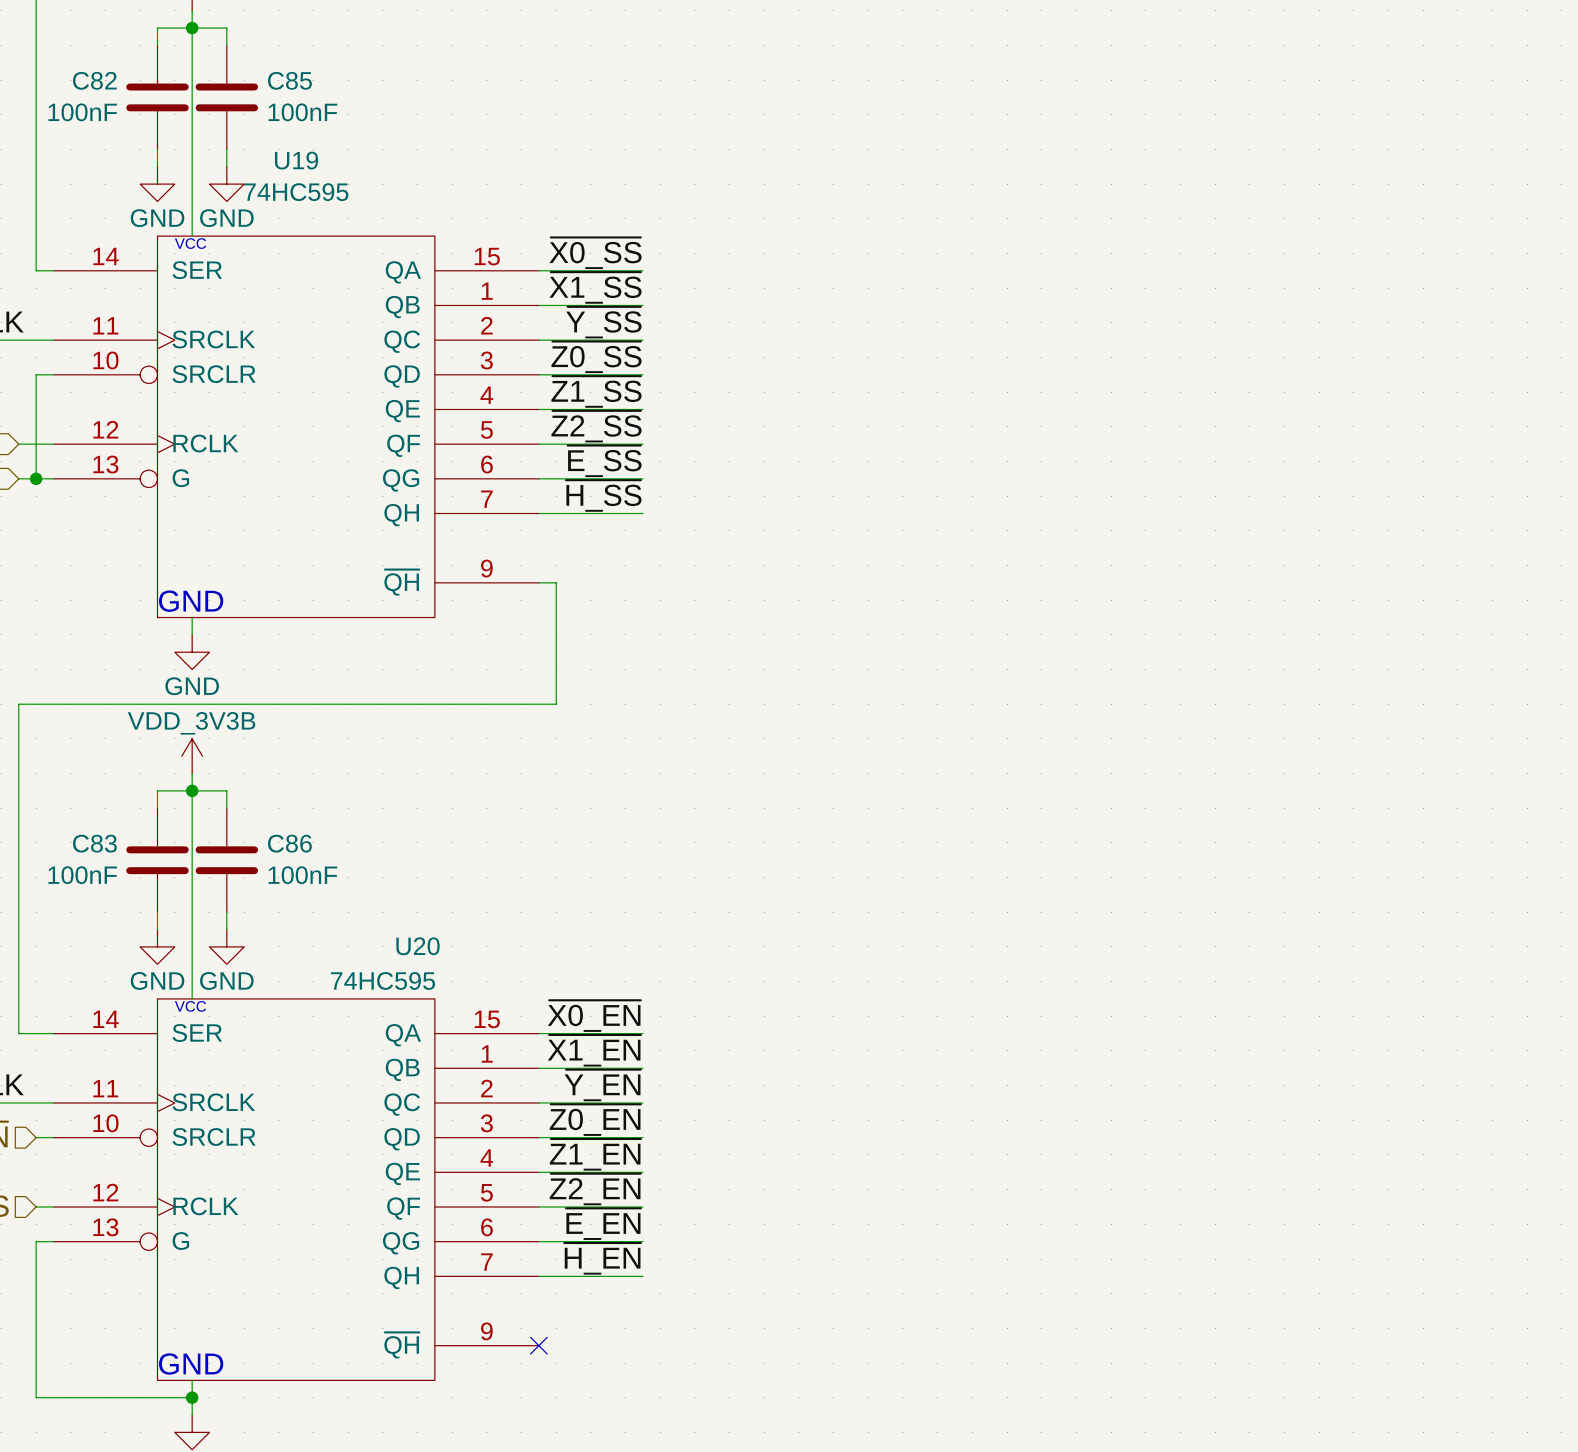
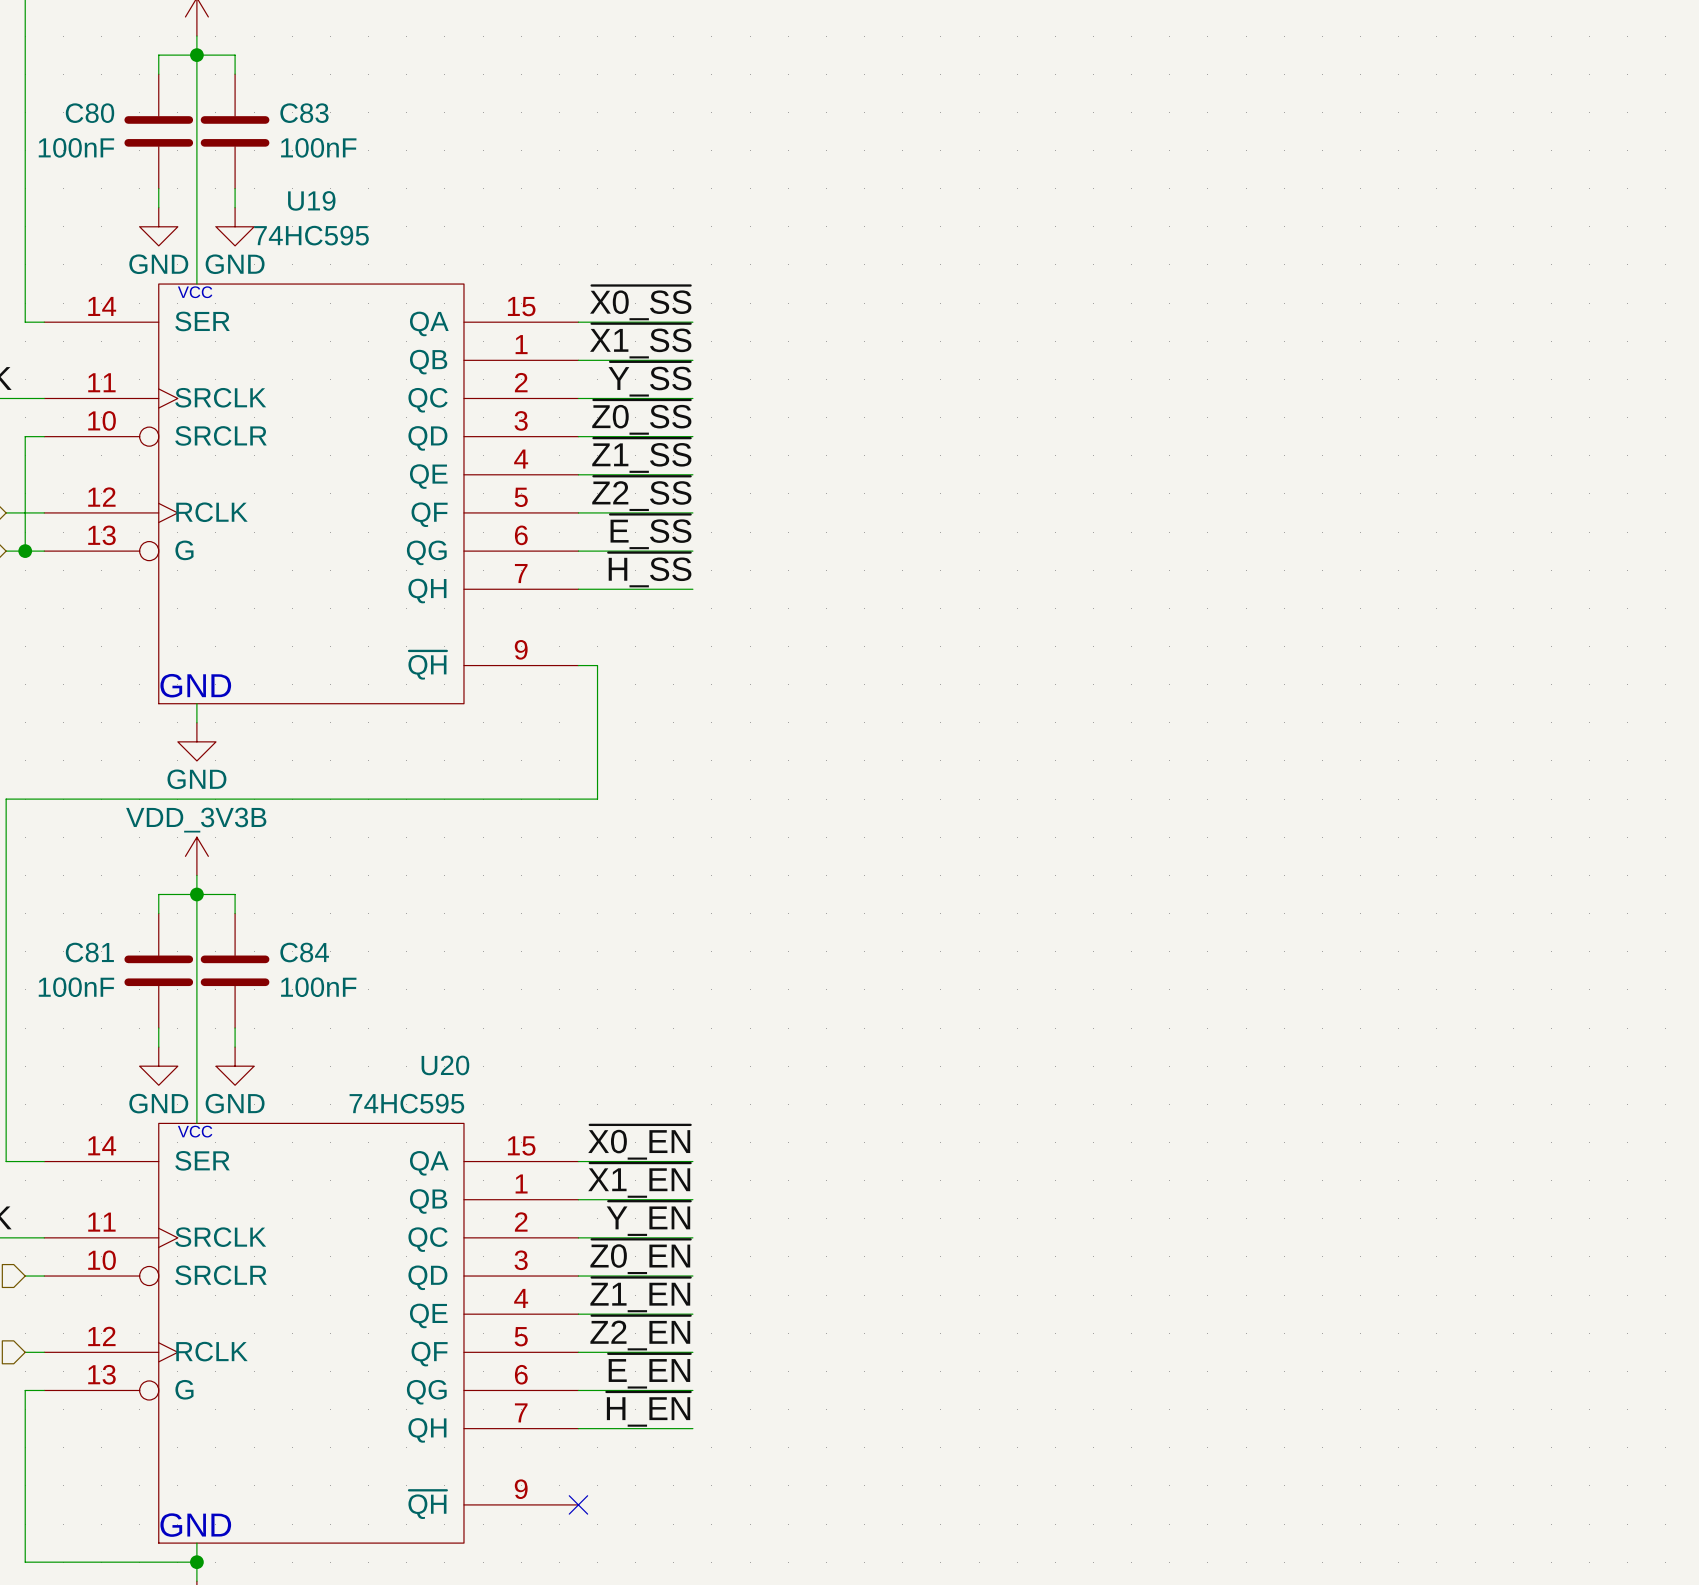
C82 name: C82 (94, 80) -> C80 (89, 113)
C85 name: C85 (289, 80) -> C83 (304, 113)
C83 name: C83 (94, 843) -> C81 (89, 952)
C86 name: C86 (289, 843) -> C84 (304, 952)

